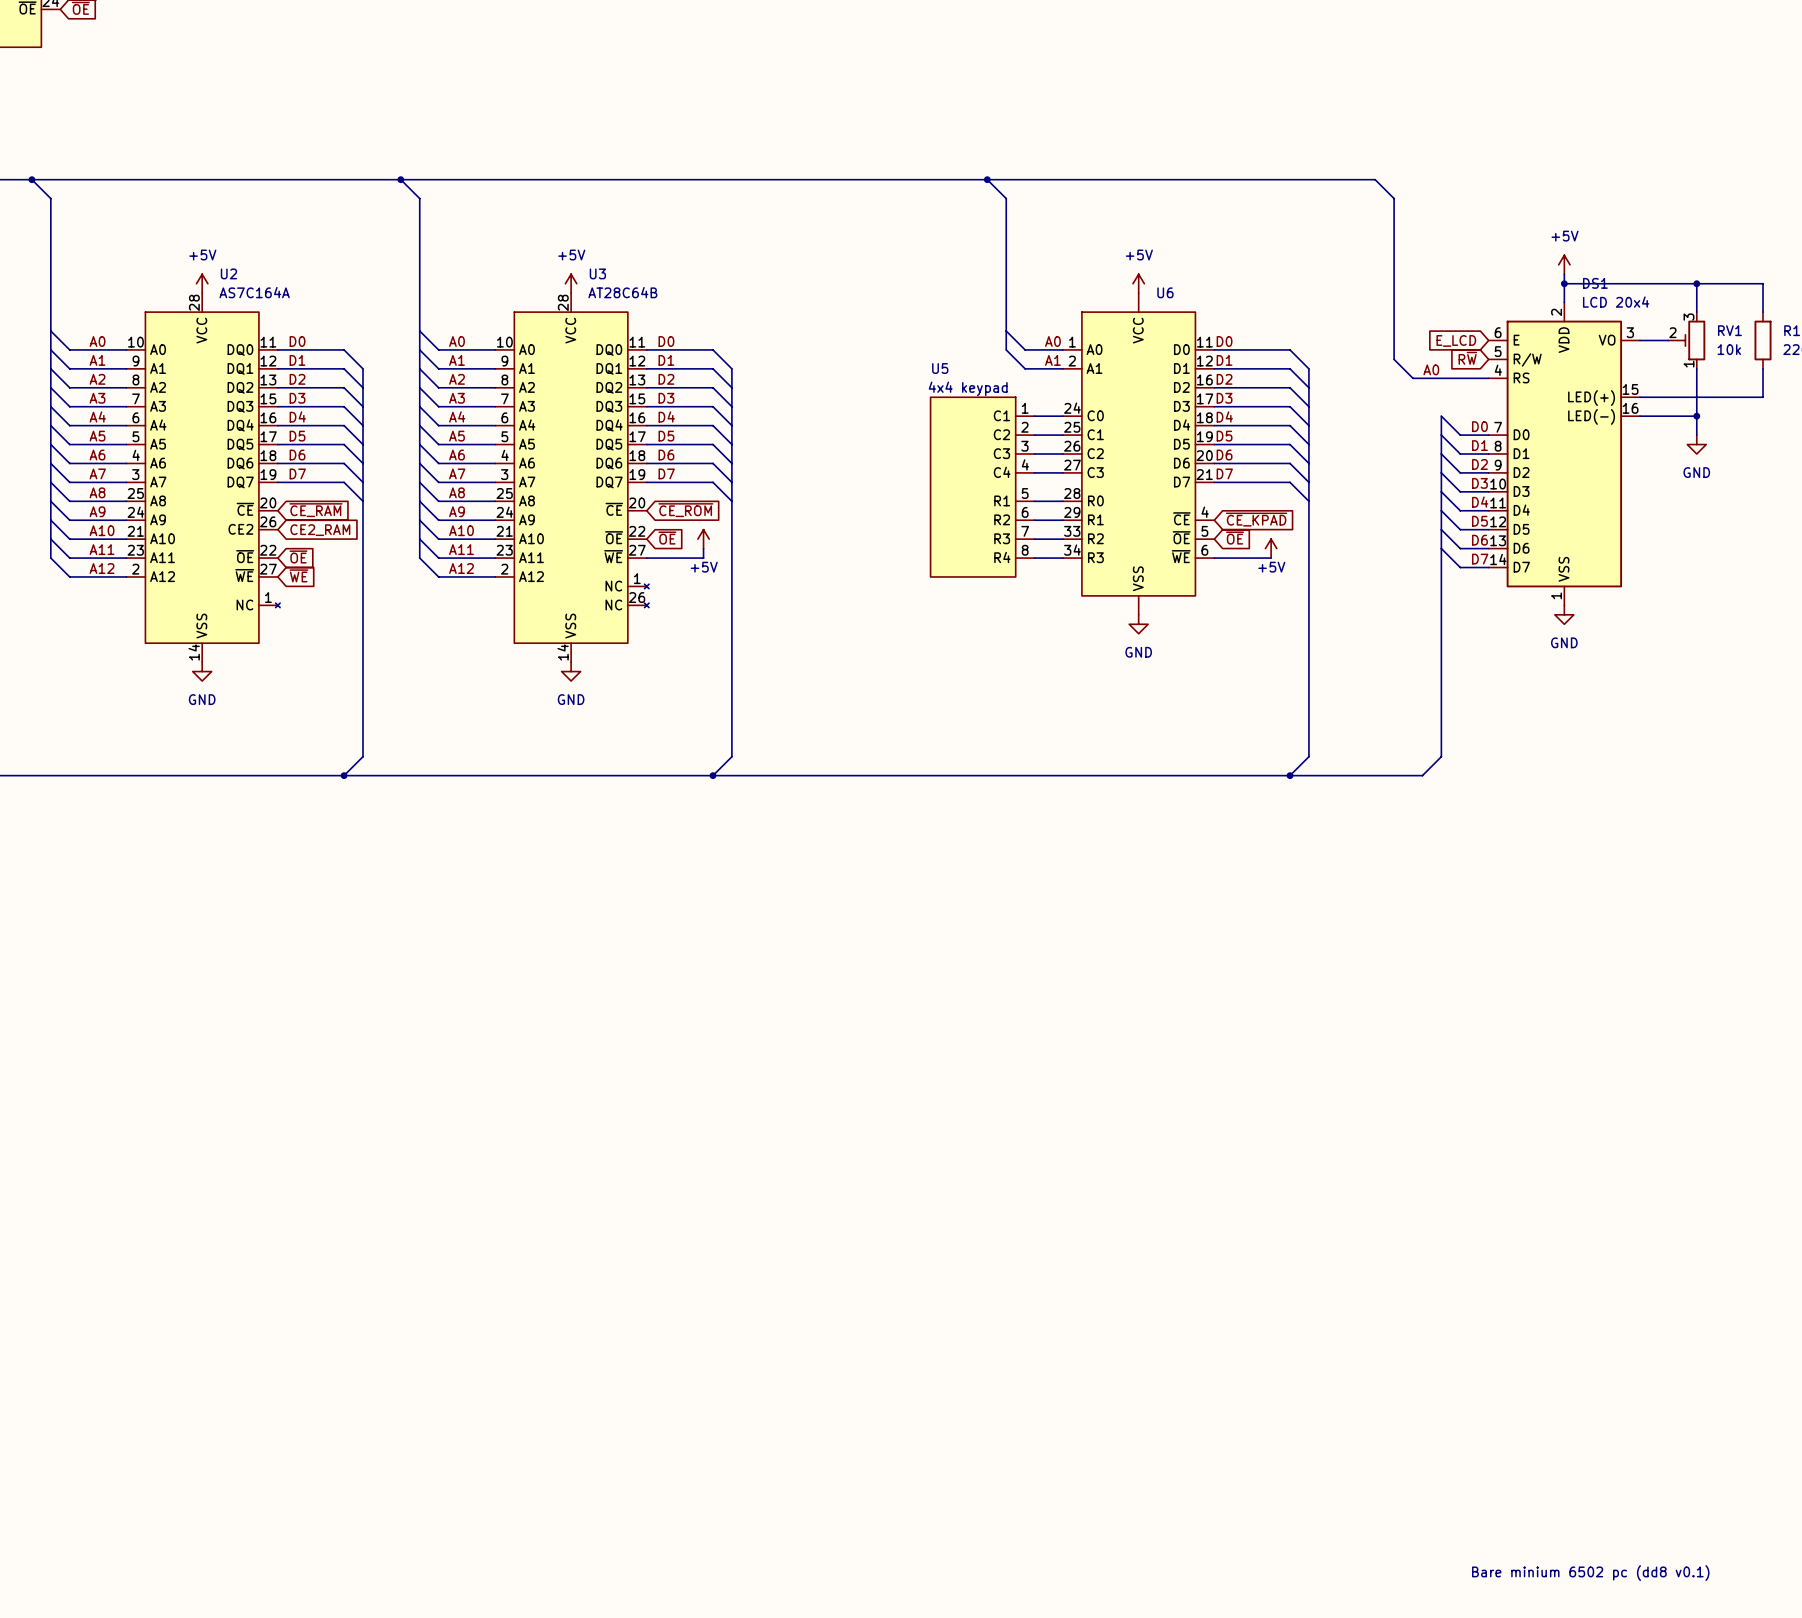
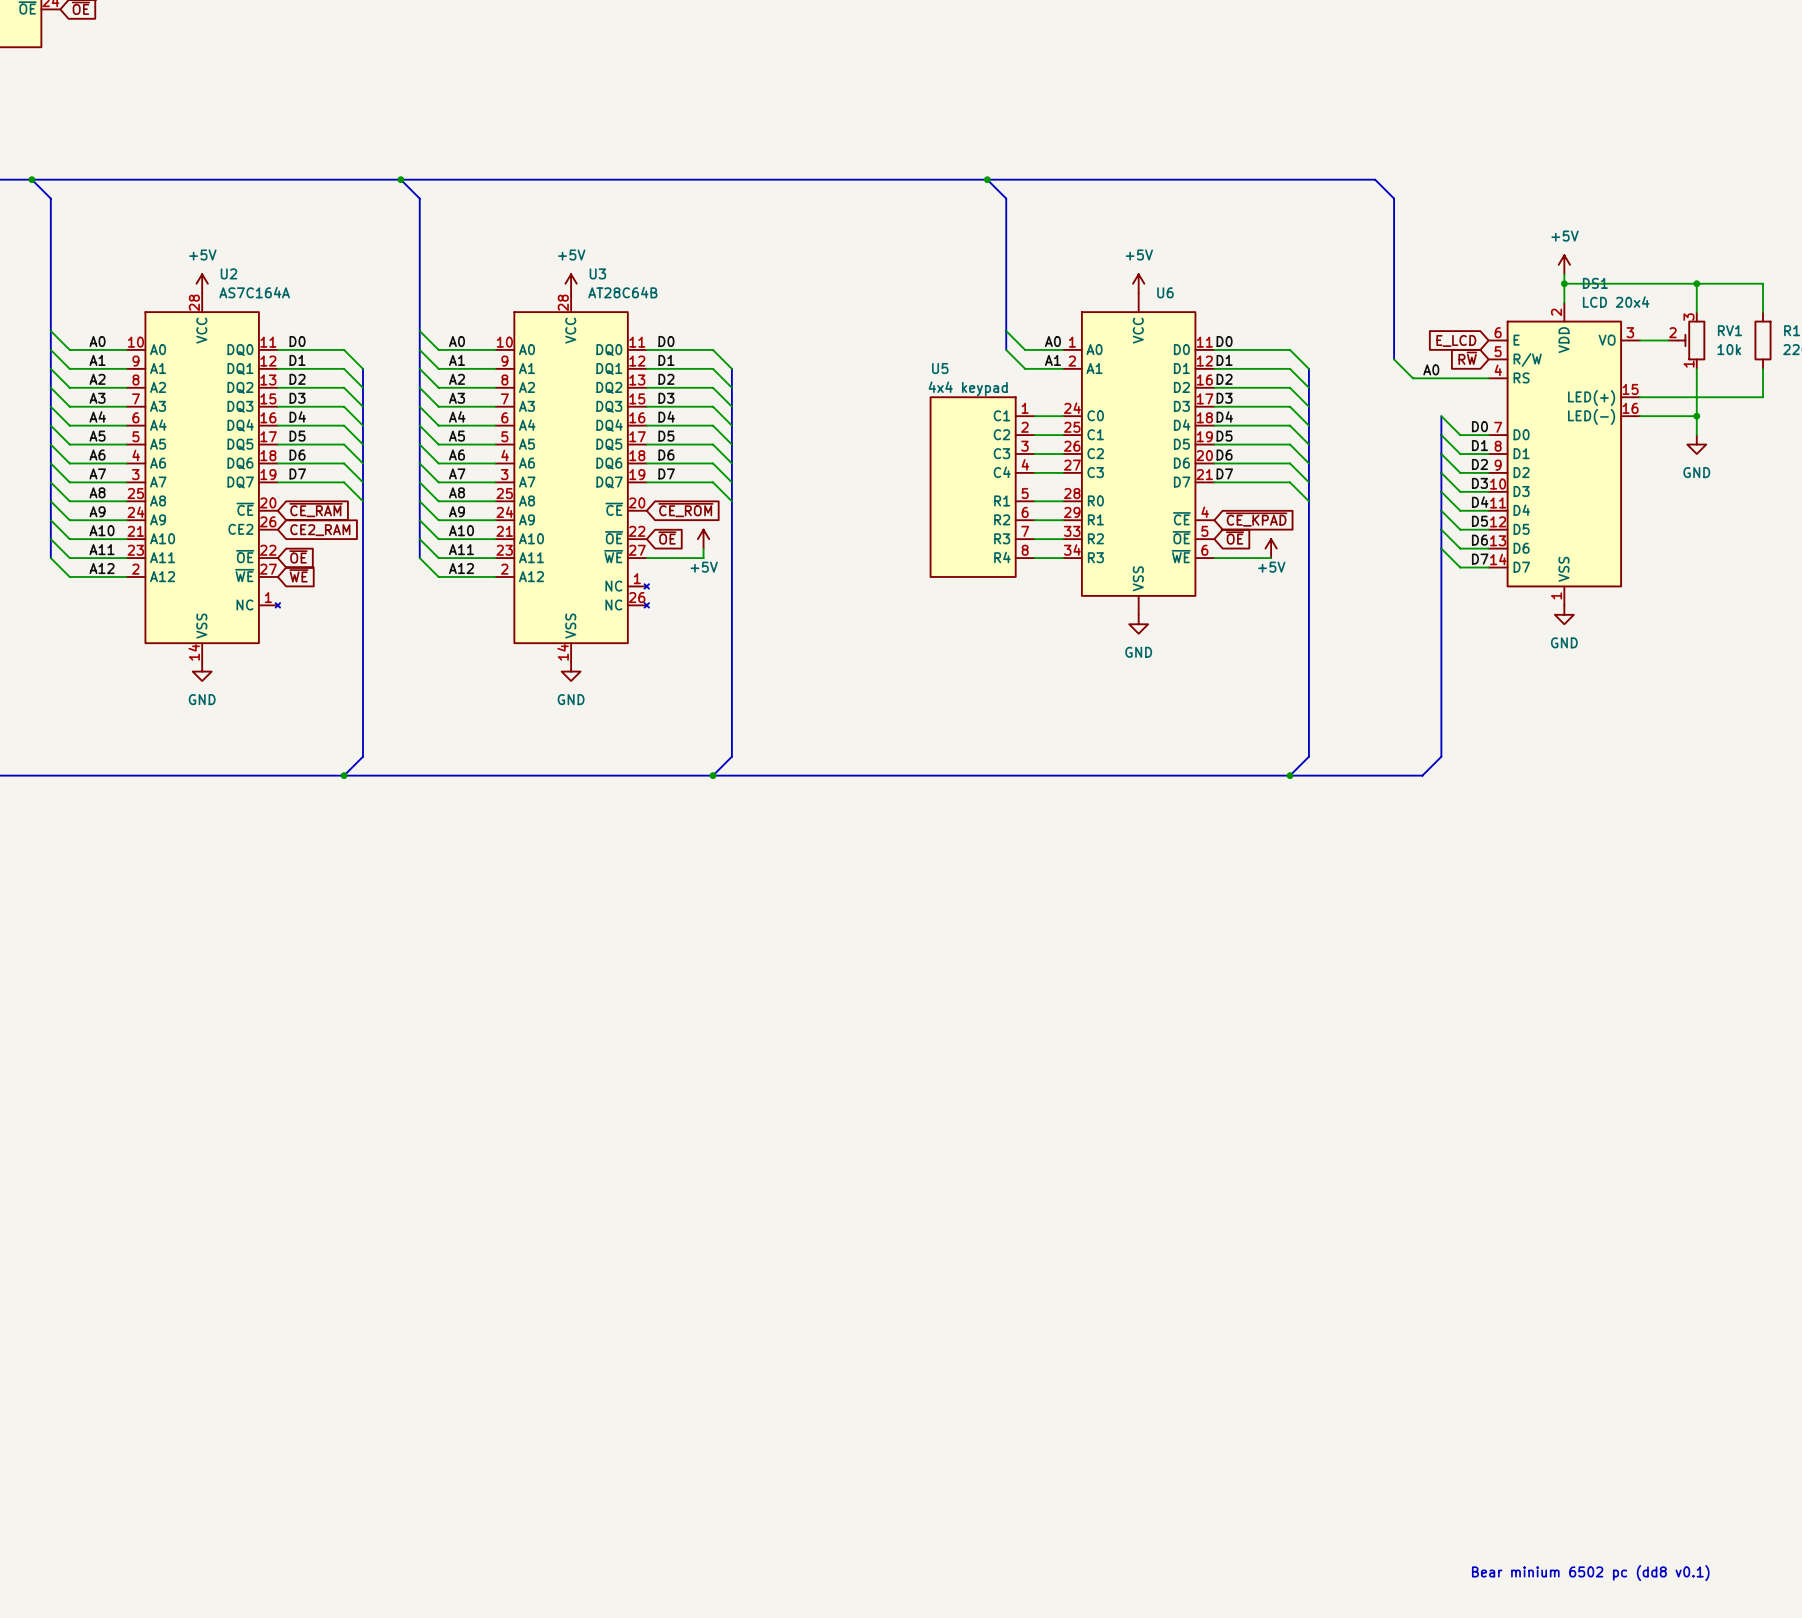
text: Bare minium 6502 pc (dd8 v0.1) (1590, 1573) -> Bear minium 6502 pc (dd8 v0.1) (1590, 1573)

